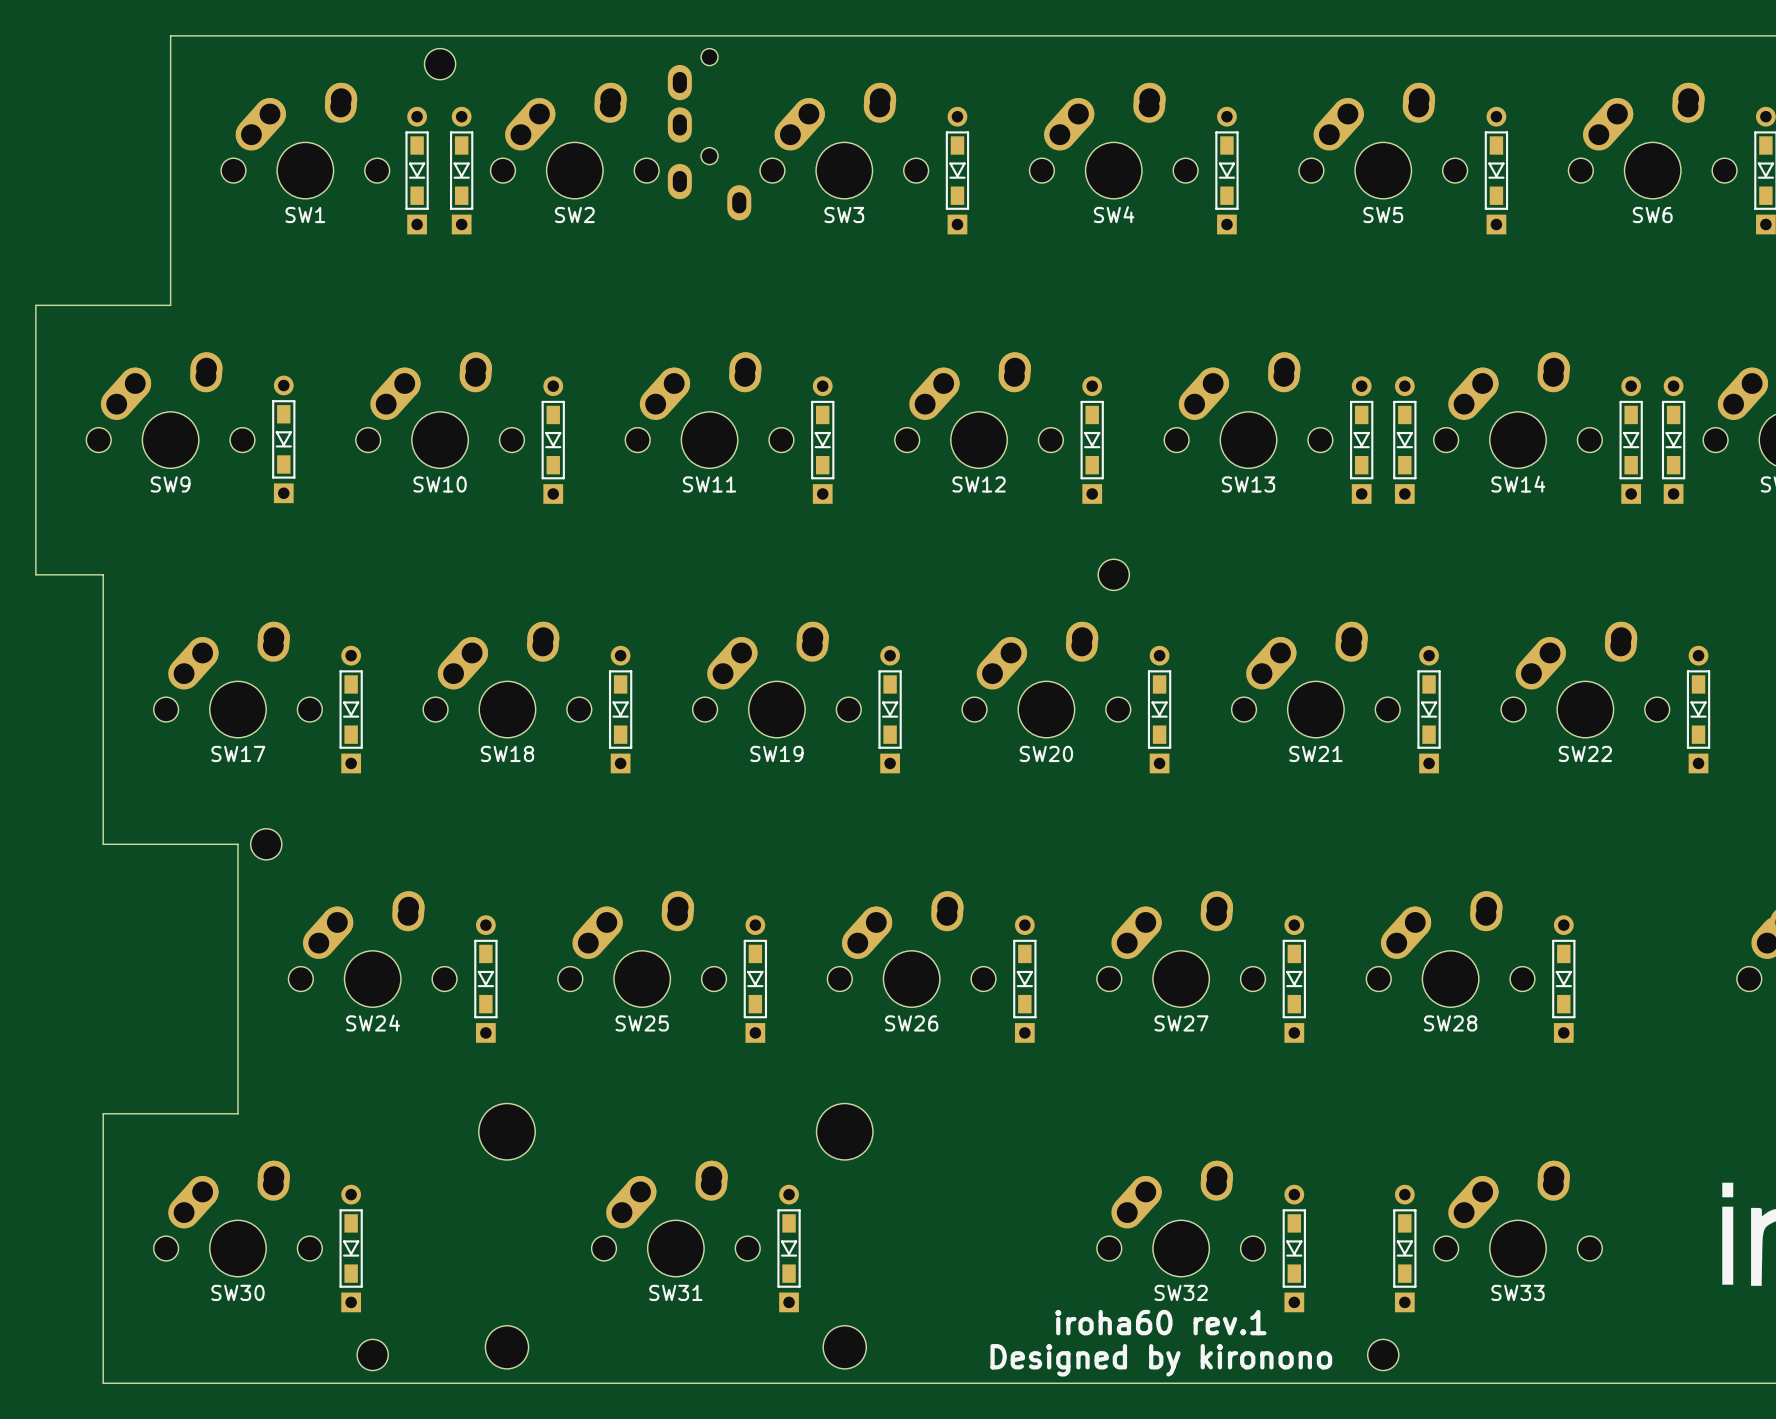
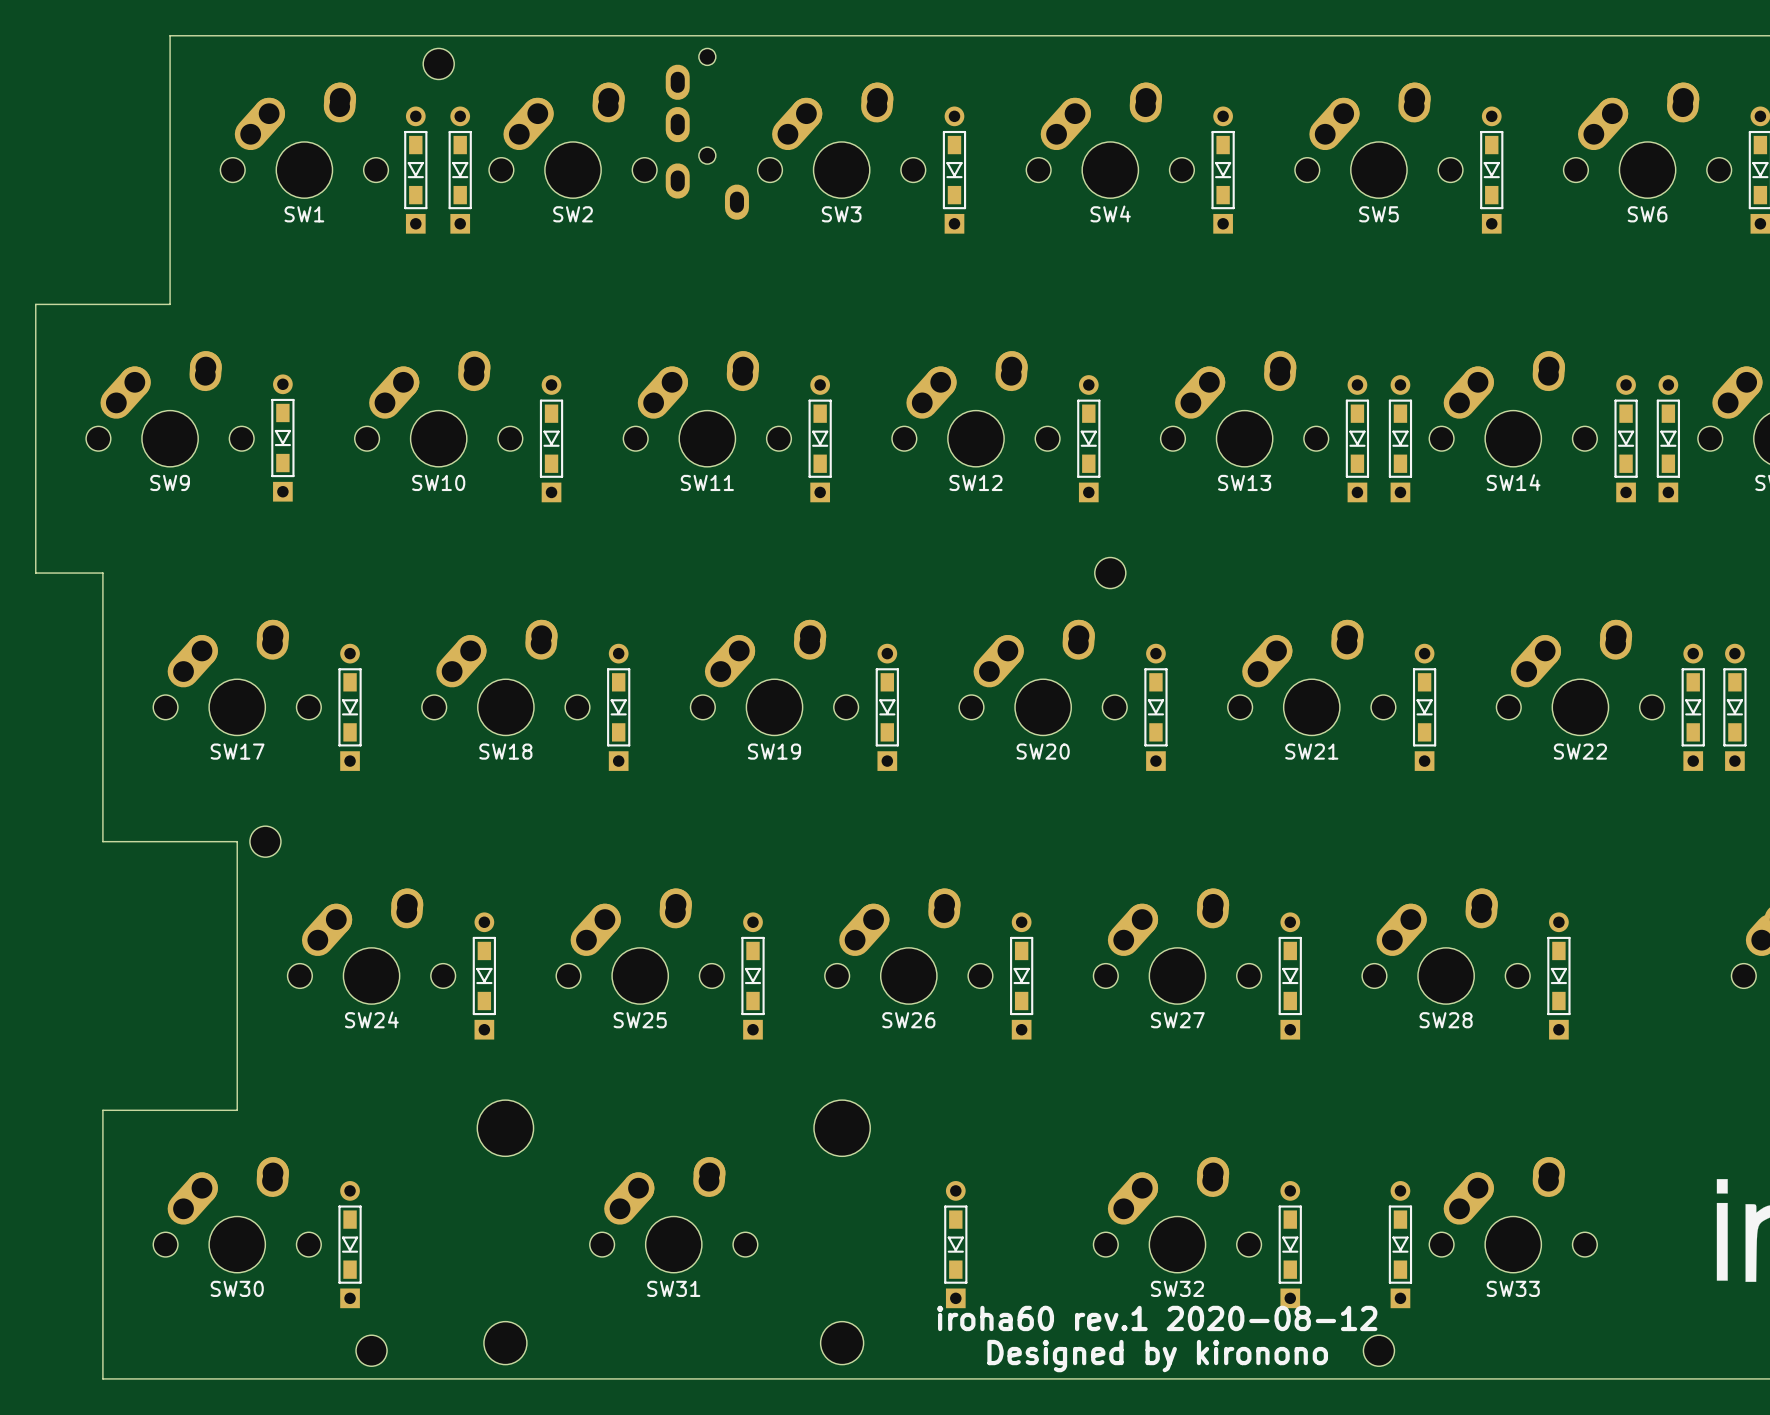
part: none -> (1734, 707)
part position: (789, 1248) -> (955, 1244)
text: iroha60 rev.1 (1160, 1322) -> iroha60 rev.1 2020-08-12 (1157, 1318)

